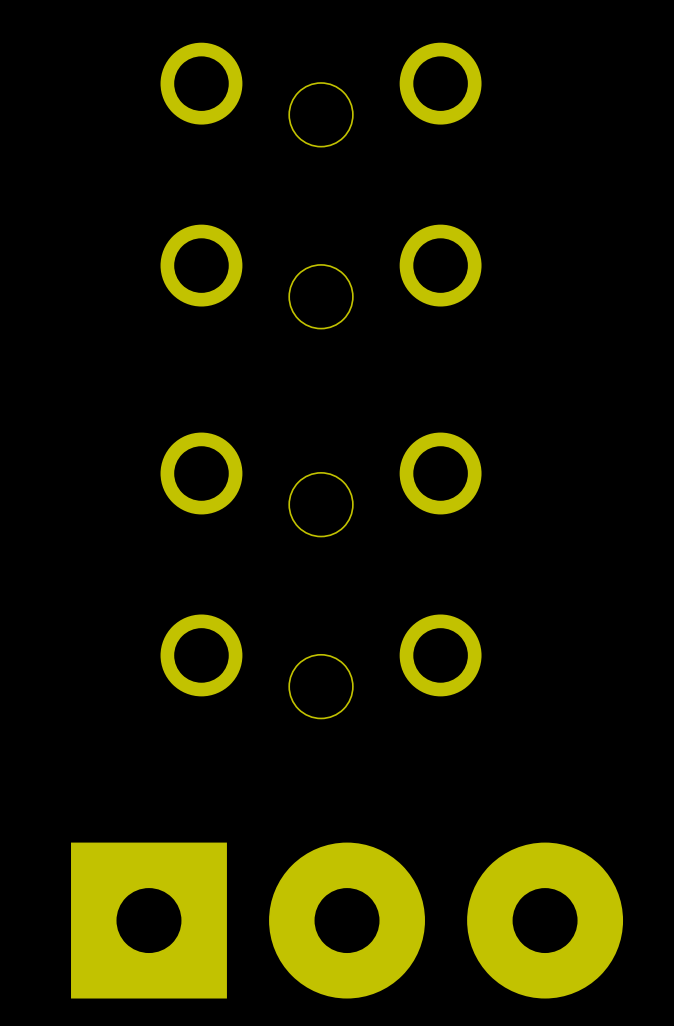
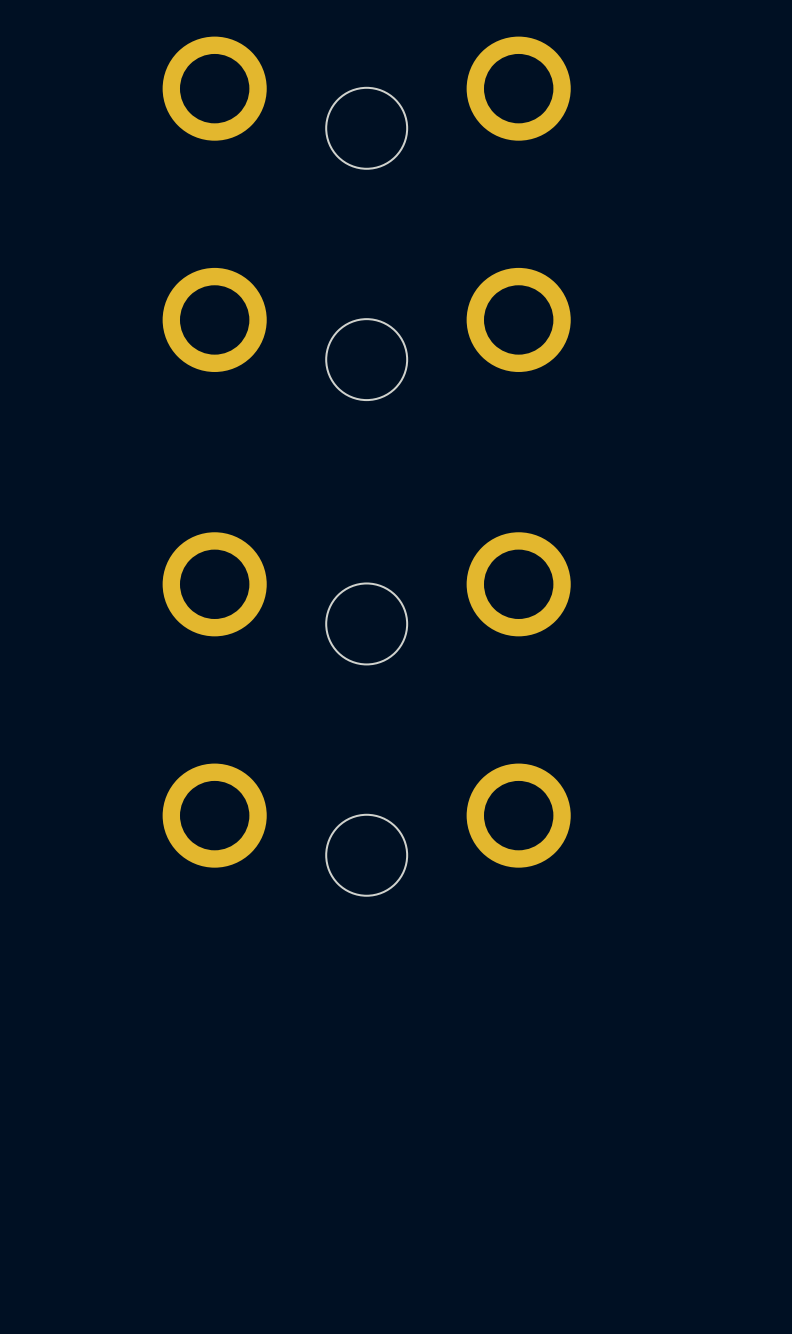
part: (347, 920) -> none

